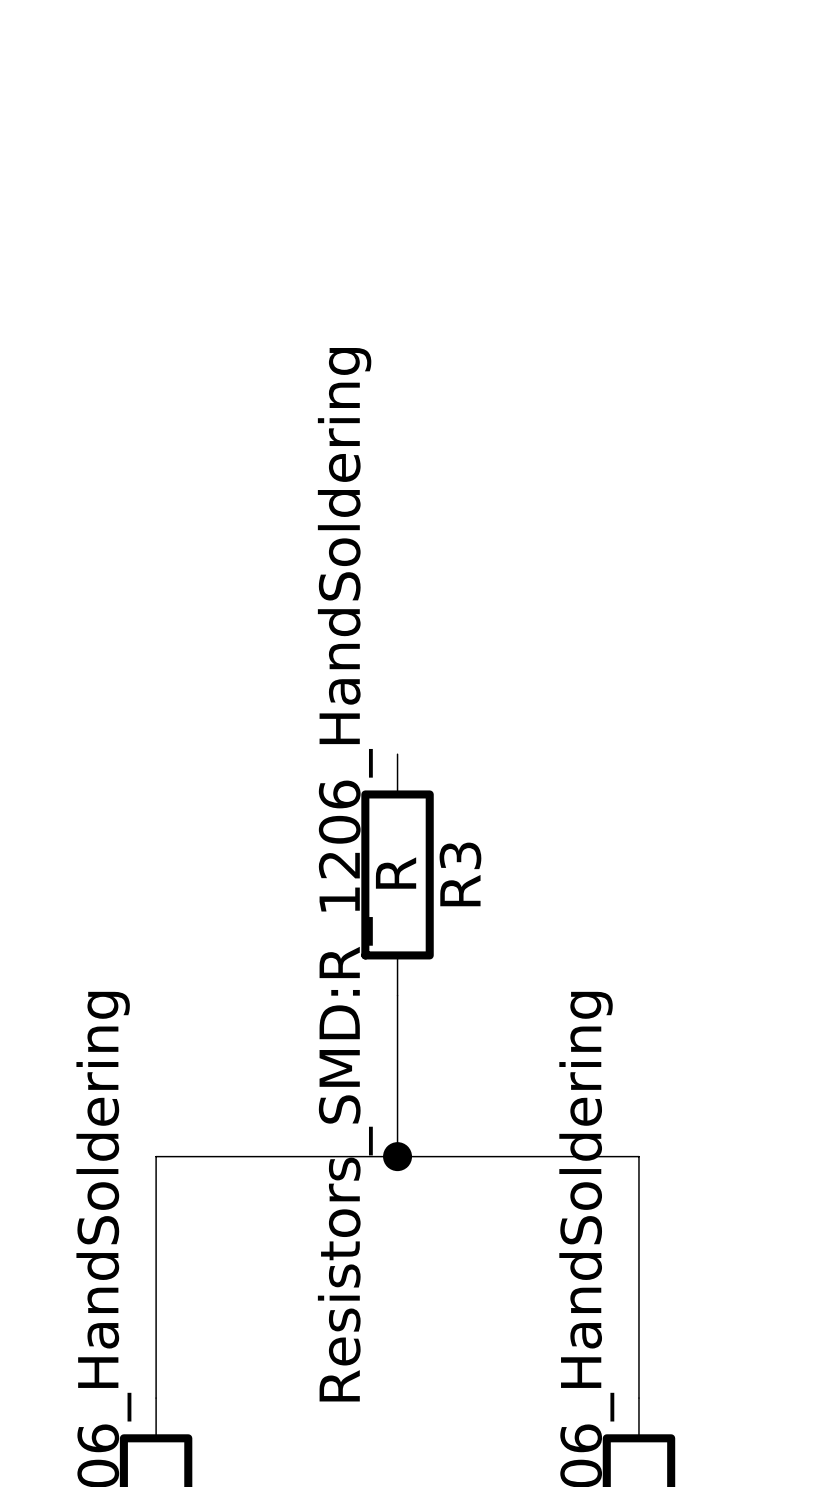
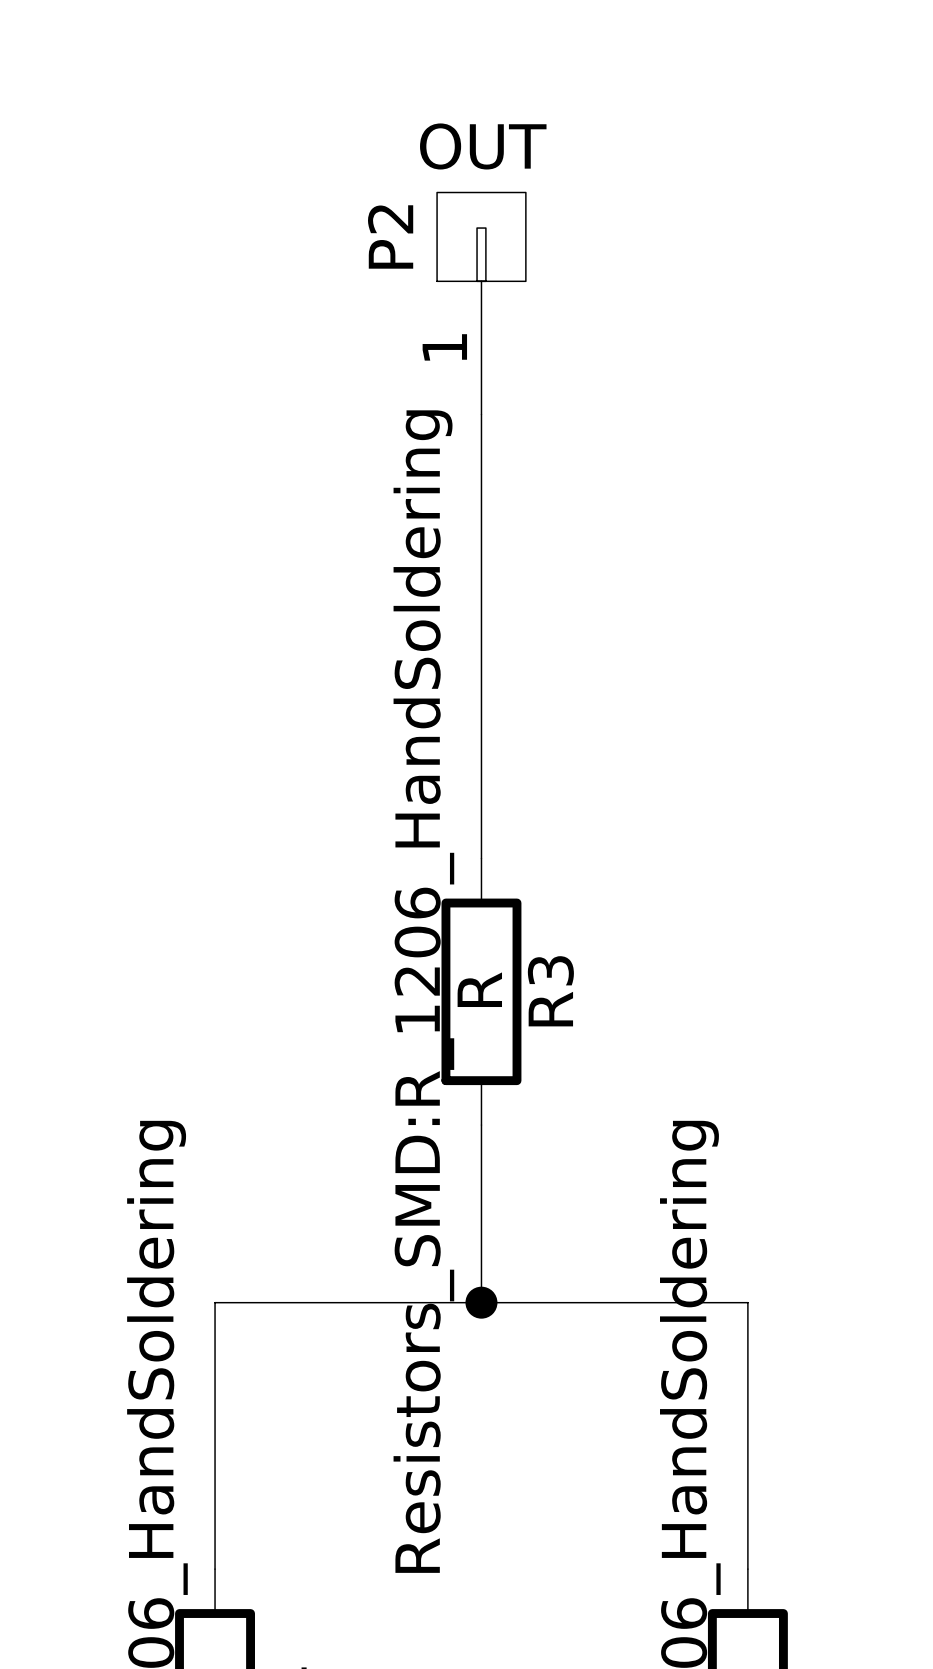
P2: none -> OUT (481, 303)
wire: none -> (481, 414) (481, 858)

